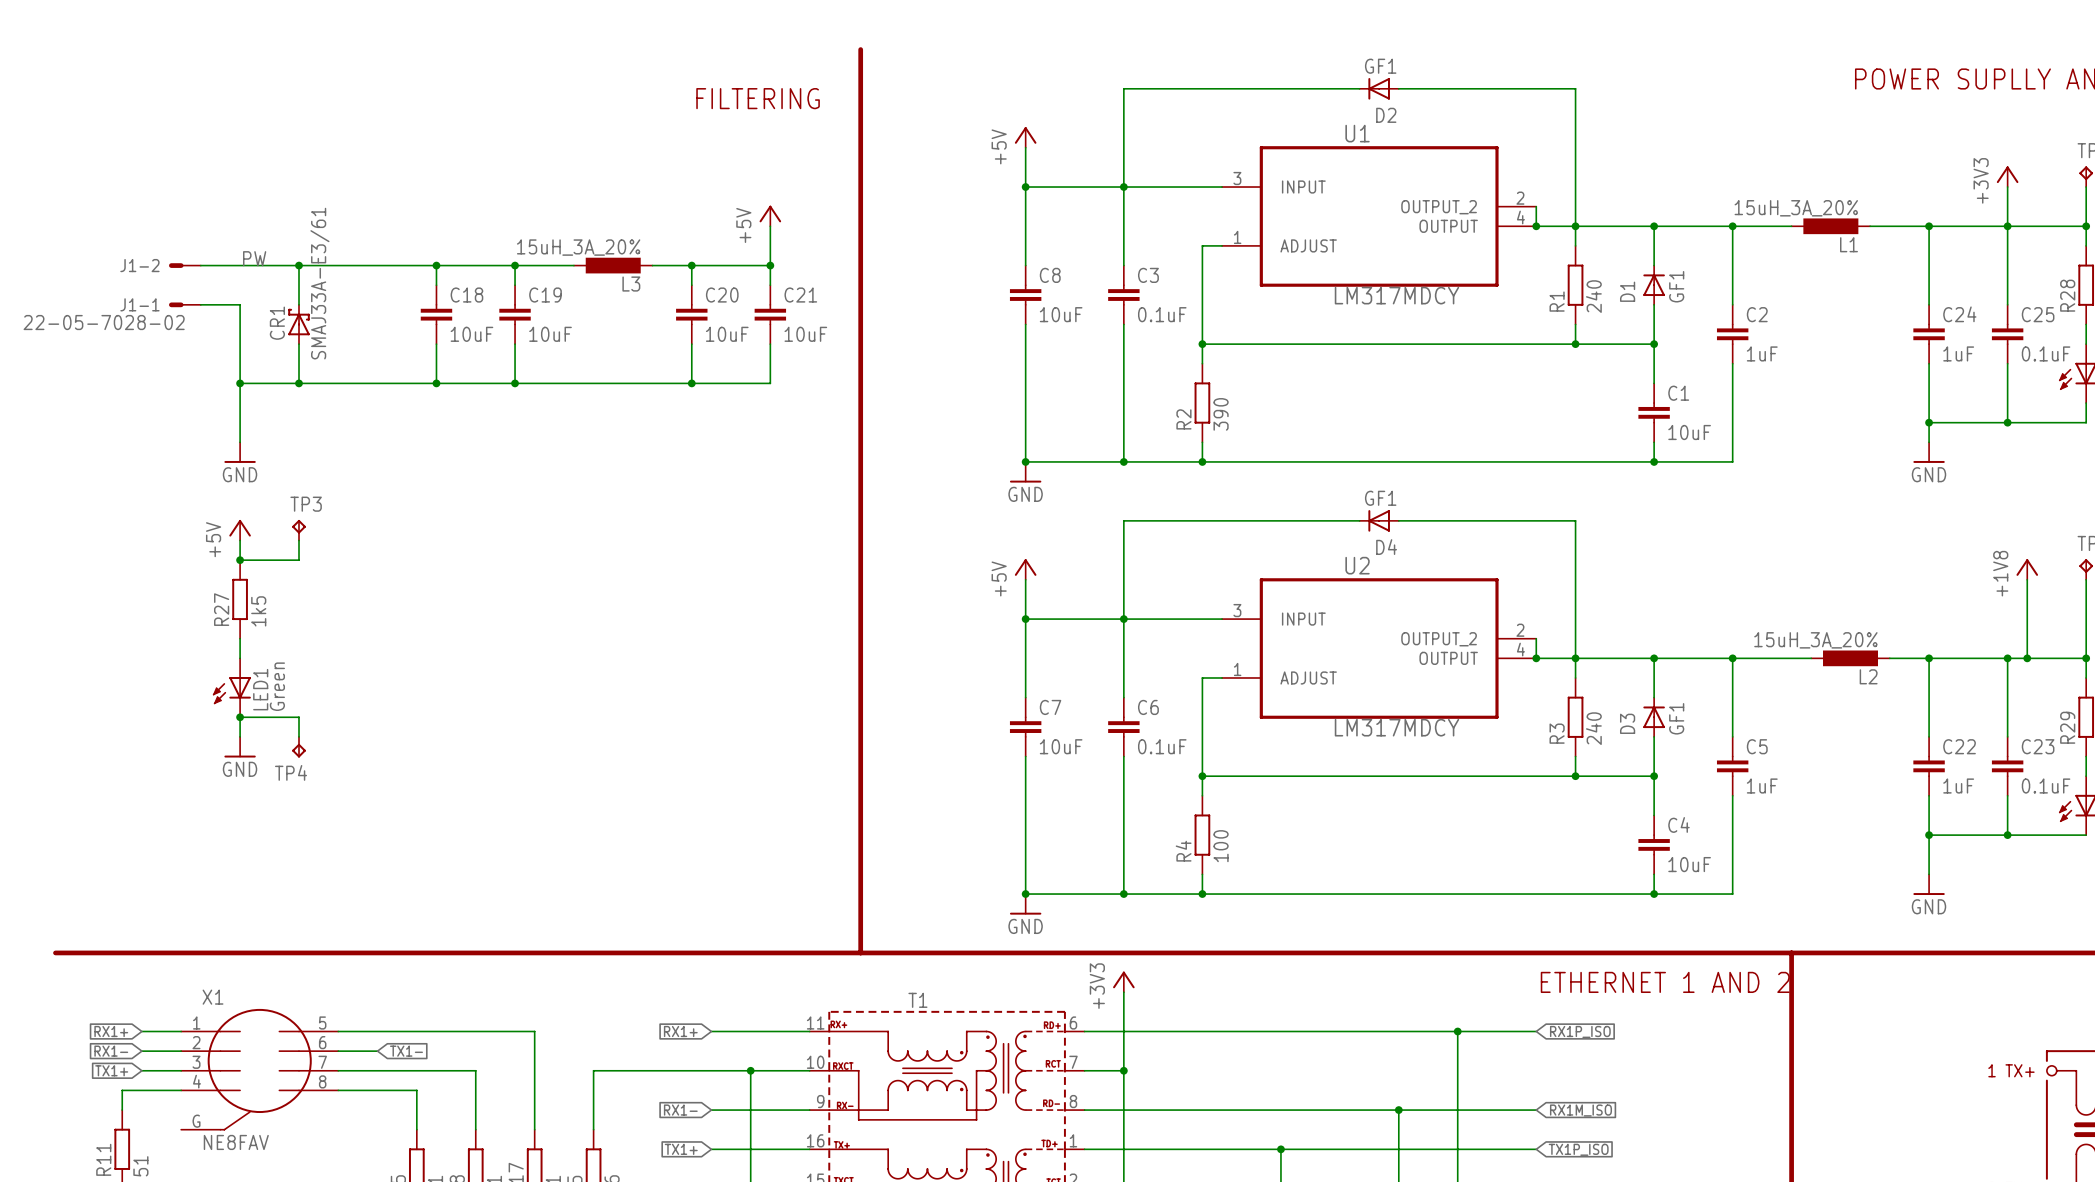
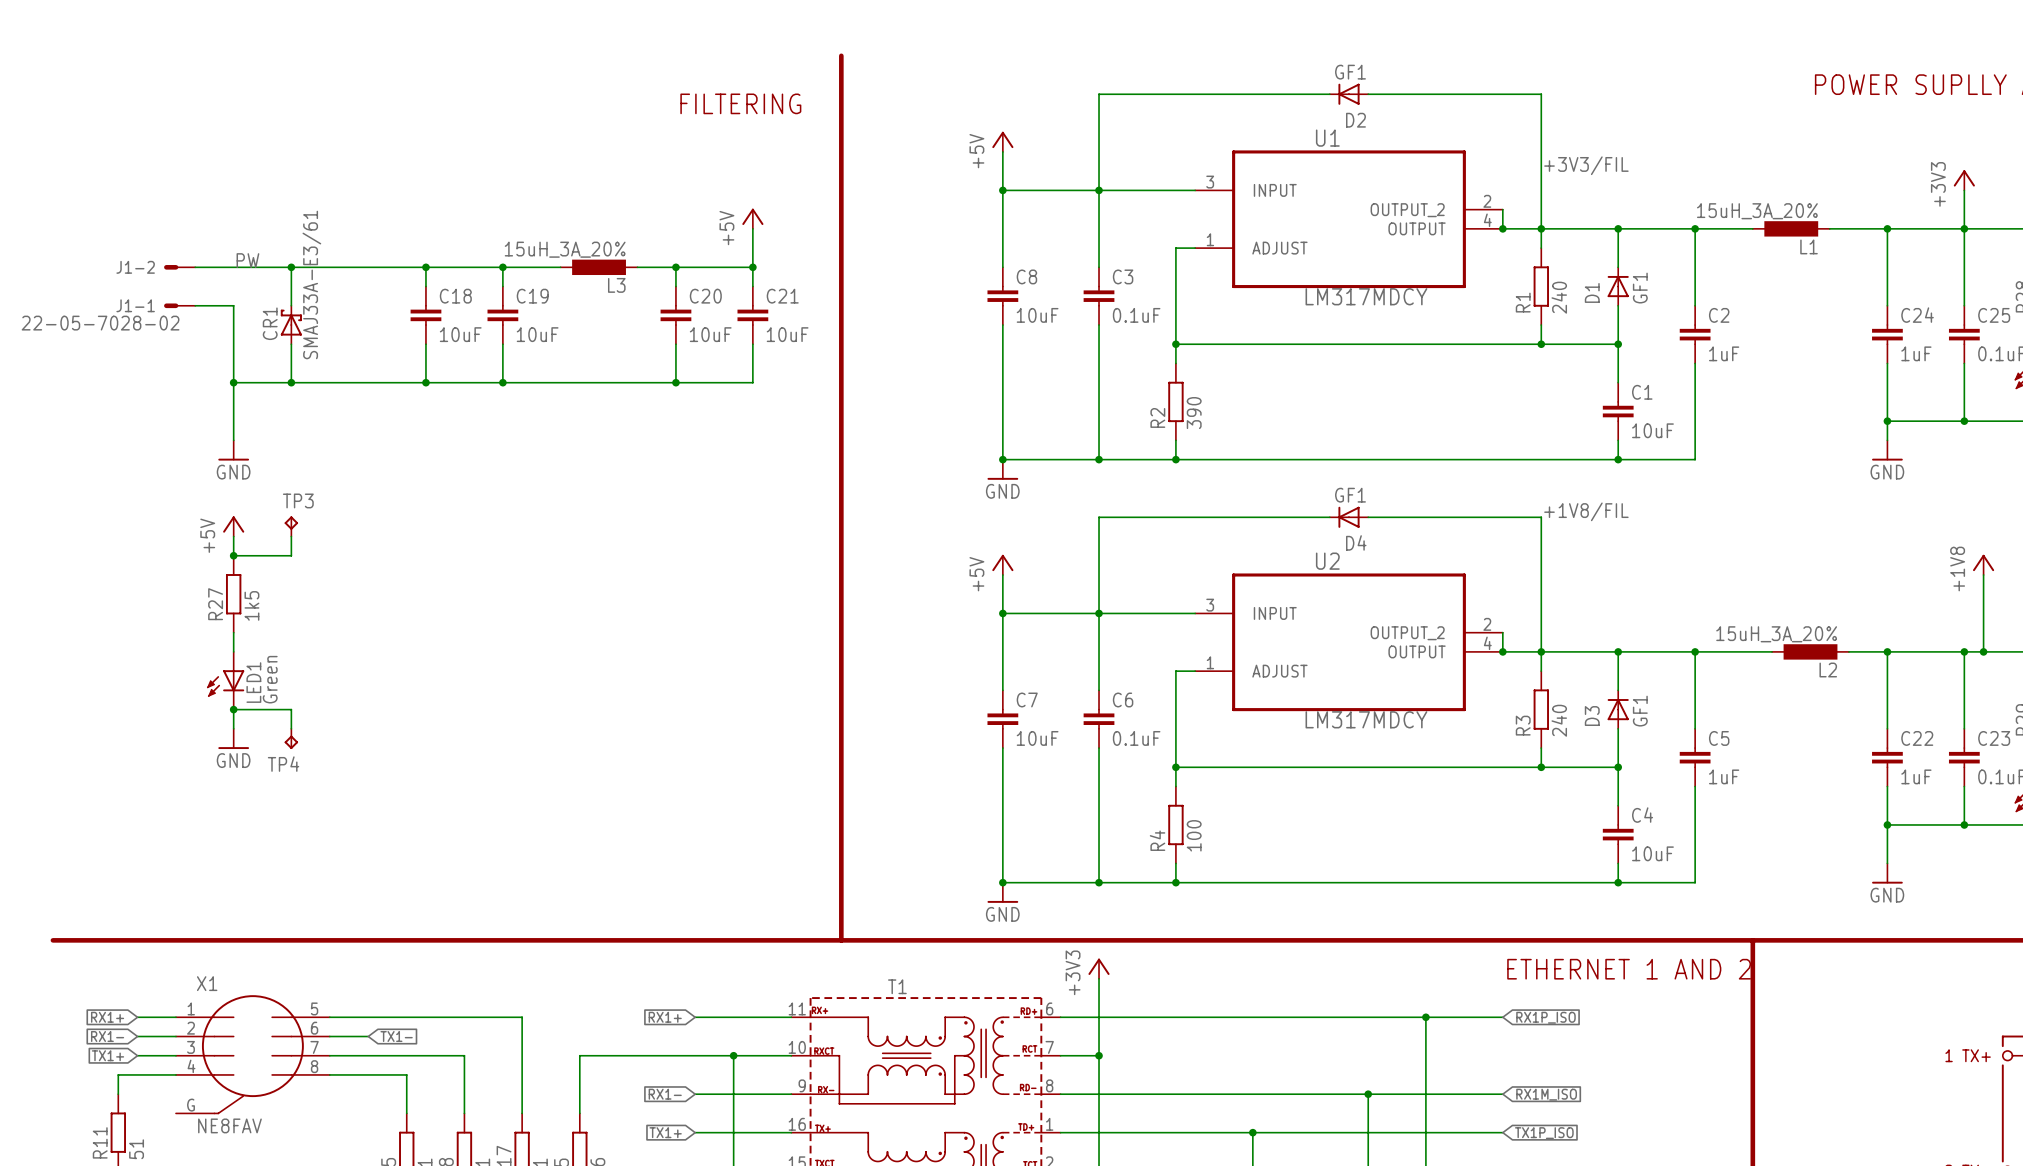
label: none -> +3V3/FIL (1586, 165)
label: none -> +1V8/FIL (1586, 511)

